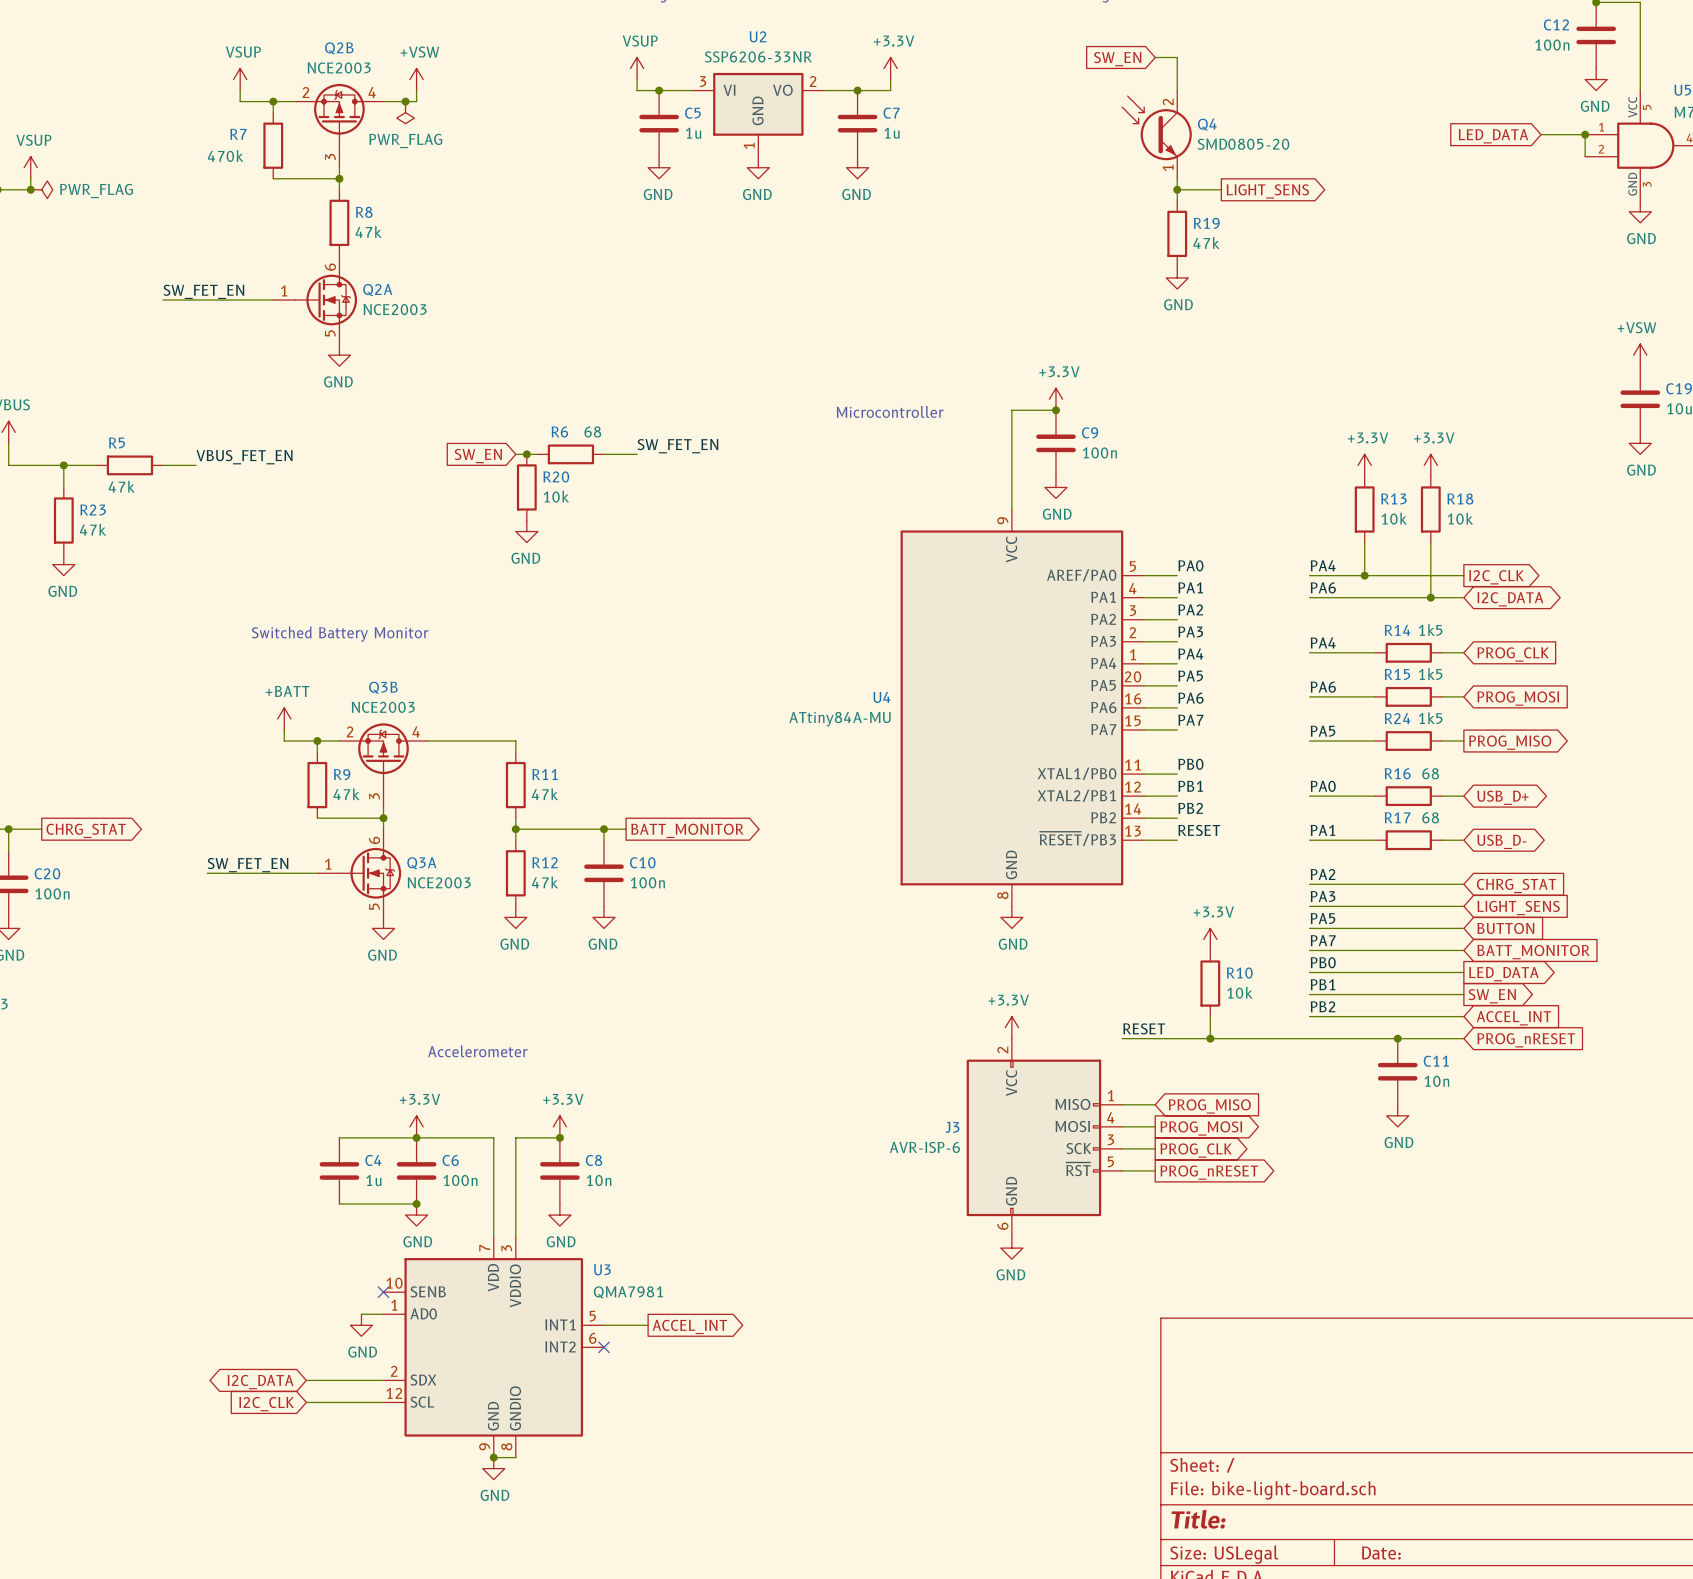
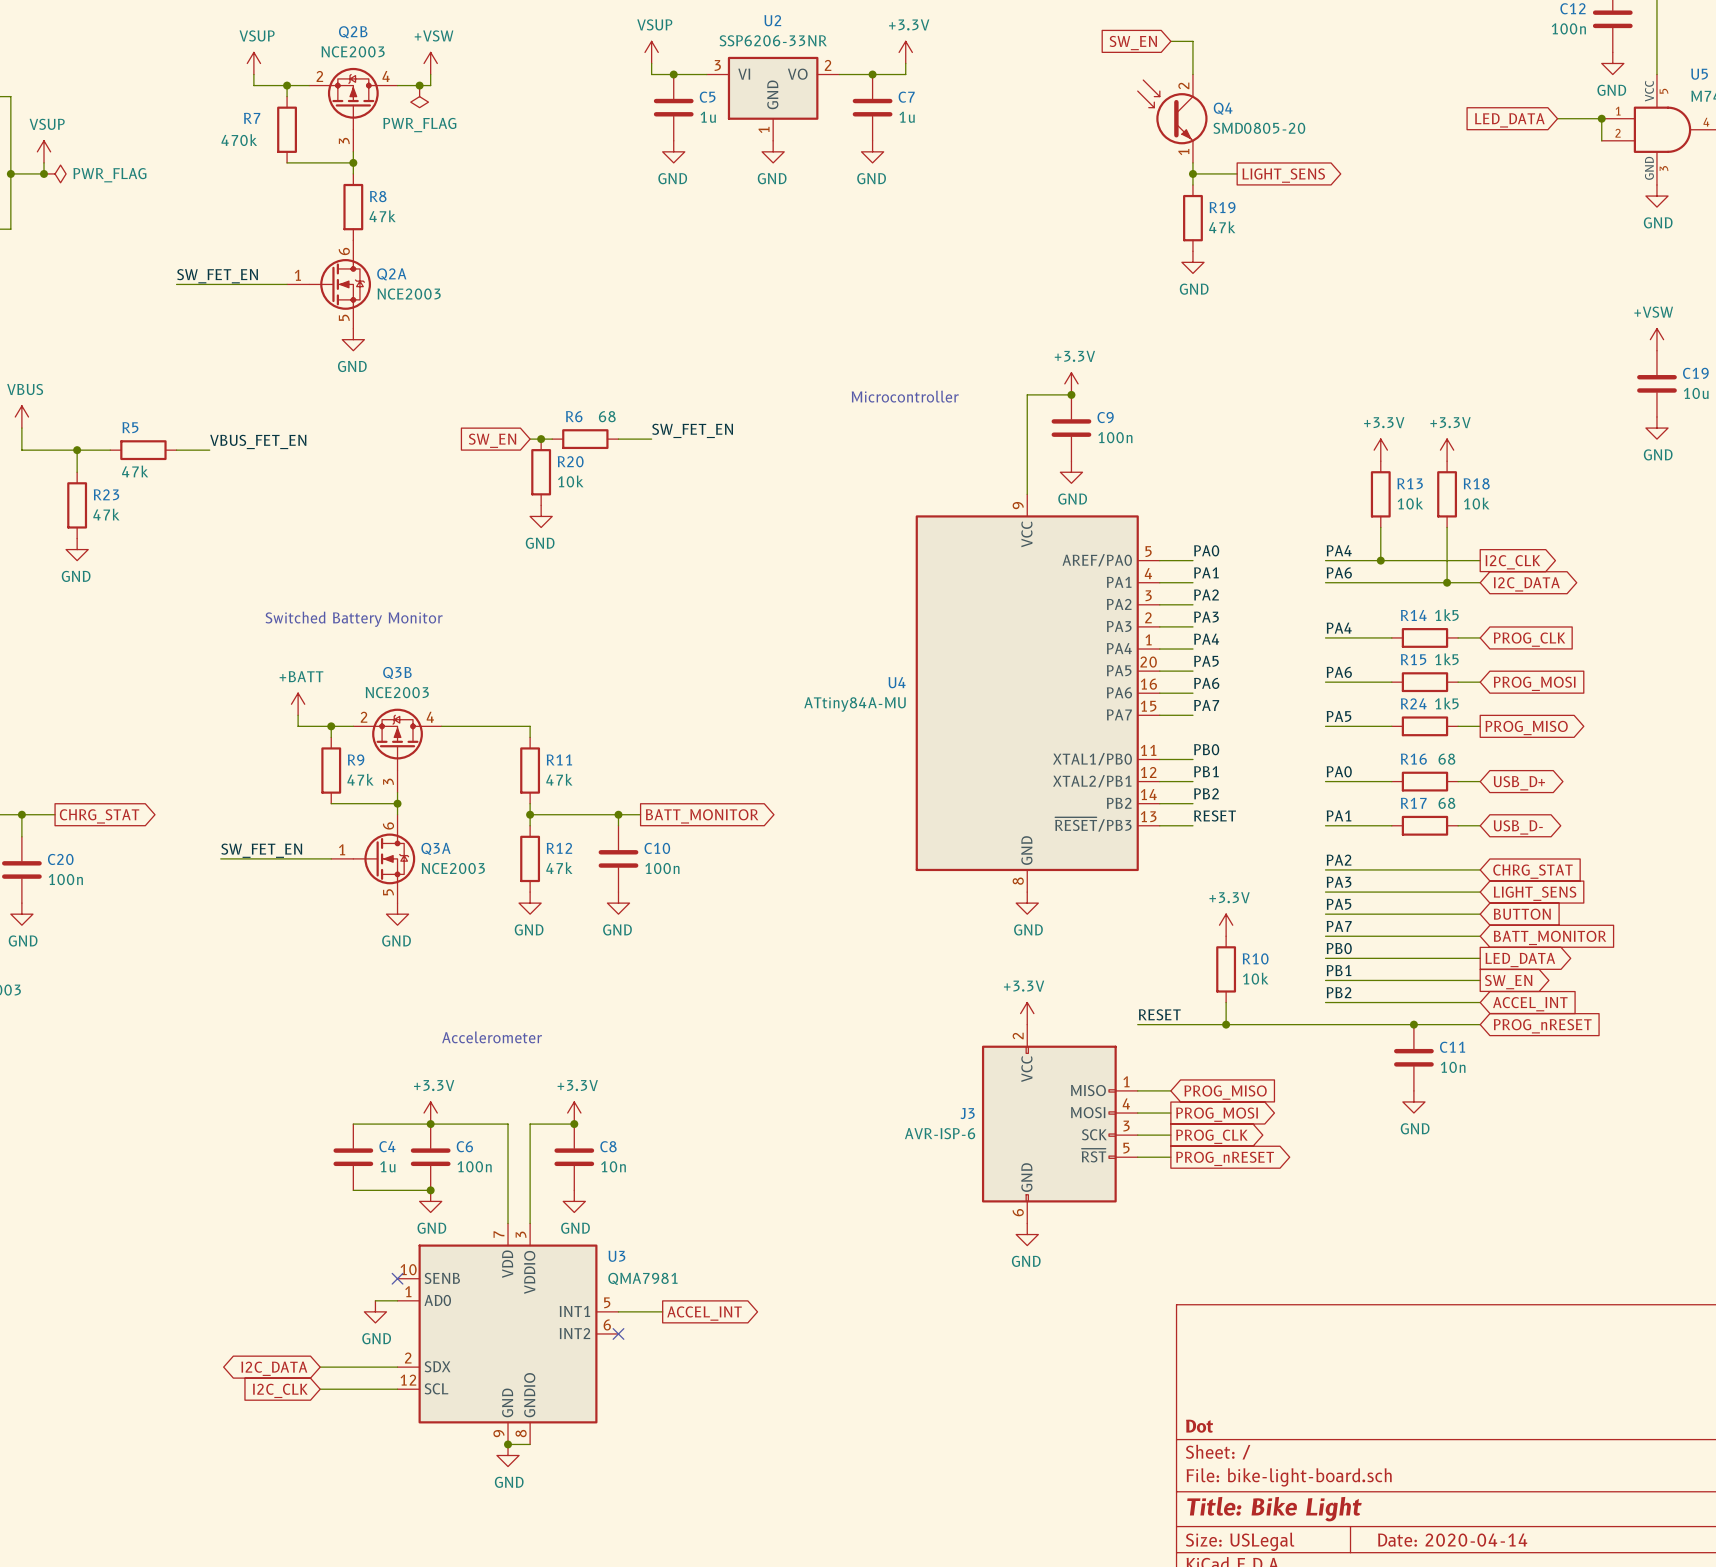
title block: none -> Dot (1199, 1426)
title block: Title: (1198, 1519) -> Title: Bike Light (1274, 1509)
title block: Date: (1381, 1553) -> Date: 2020-04-14 (1452, 1540)

